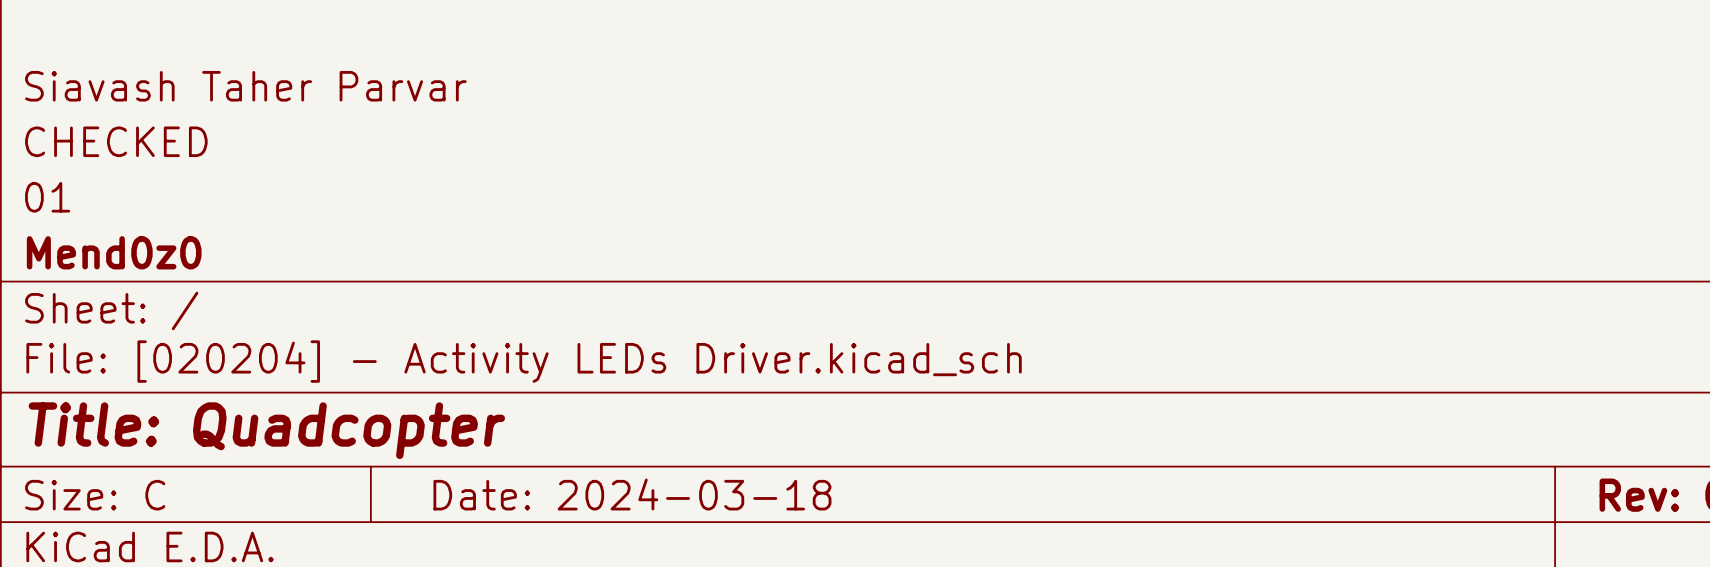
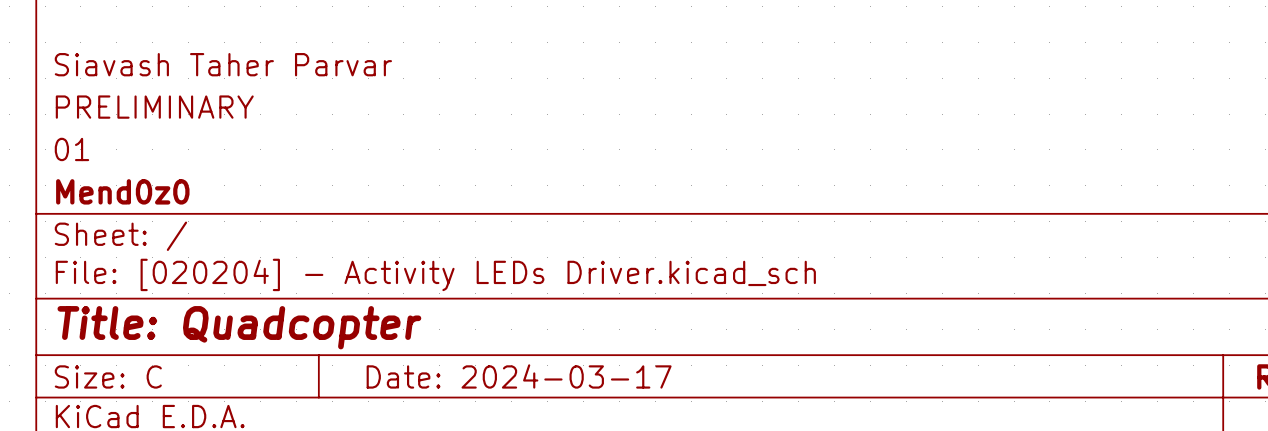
title block: CHECKED (116, 141) -> PRELIMINARY (154, 107)
title block: Date: 2024-03-18 (632, 494) -> Date: 2024-03-17 (519, 376)

